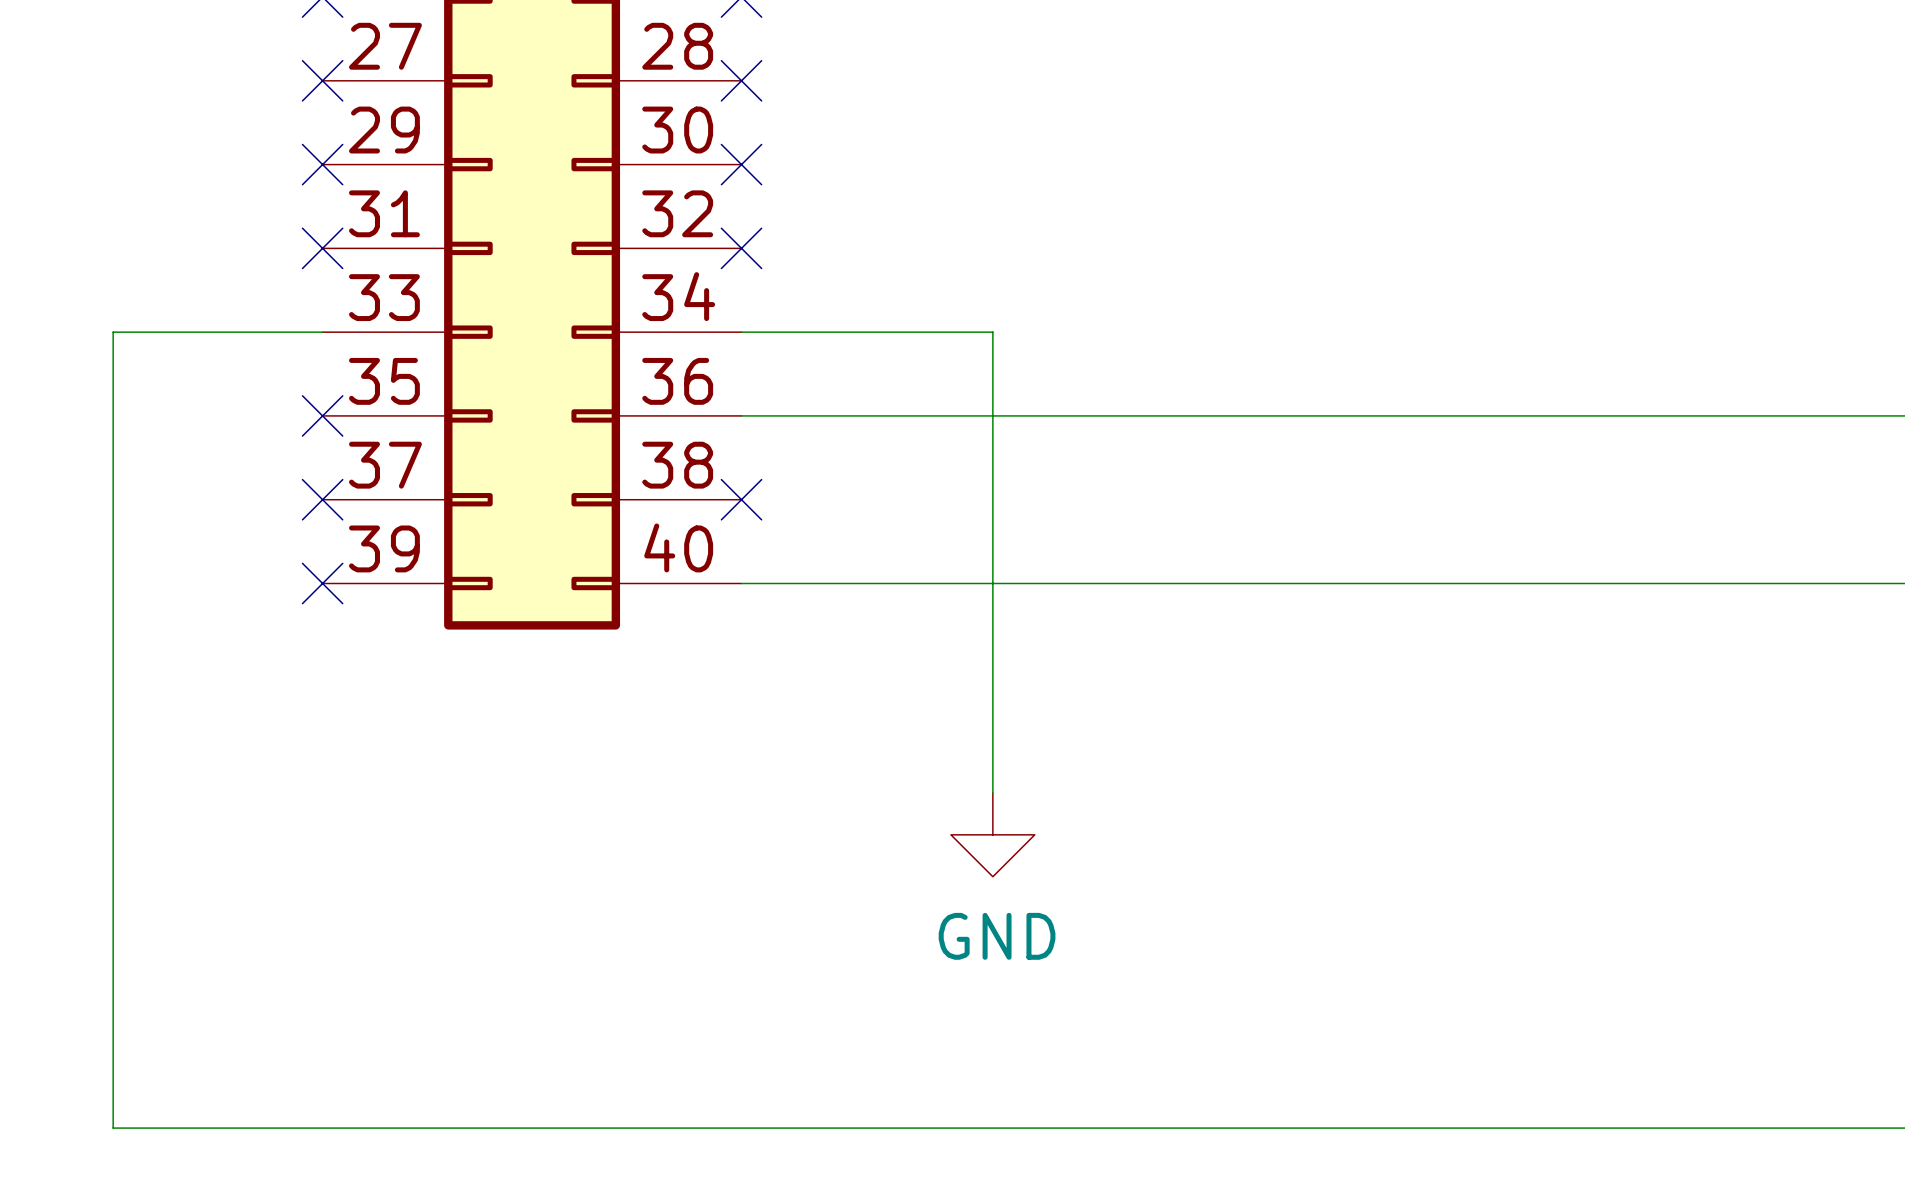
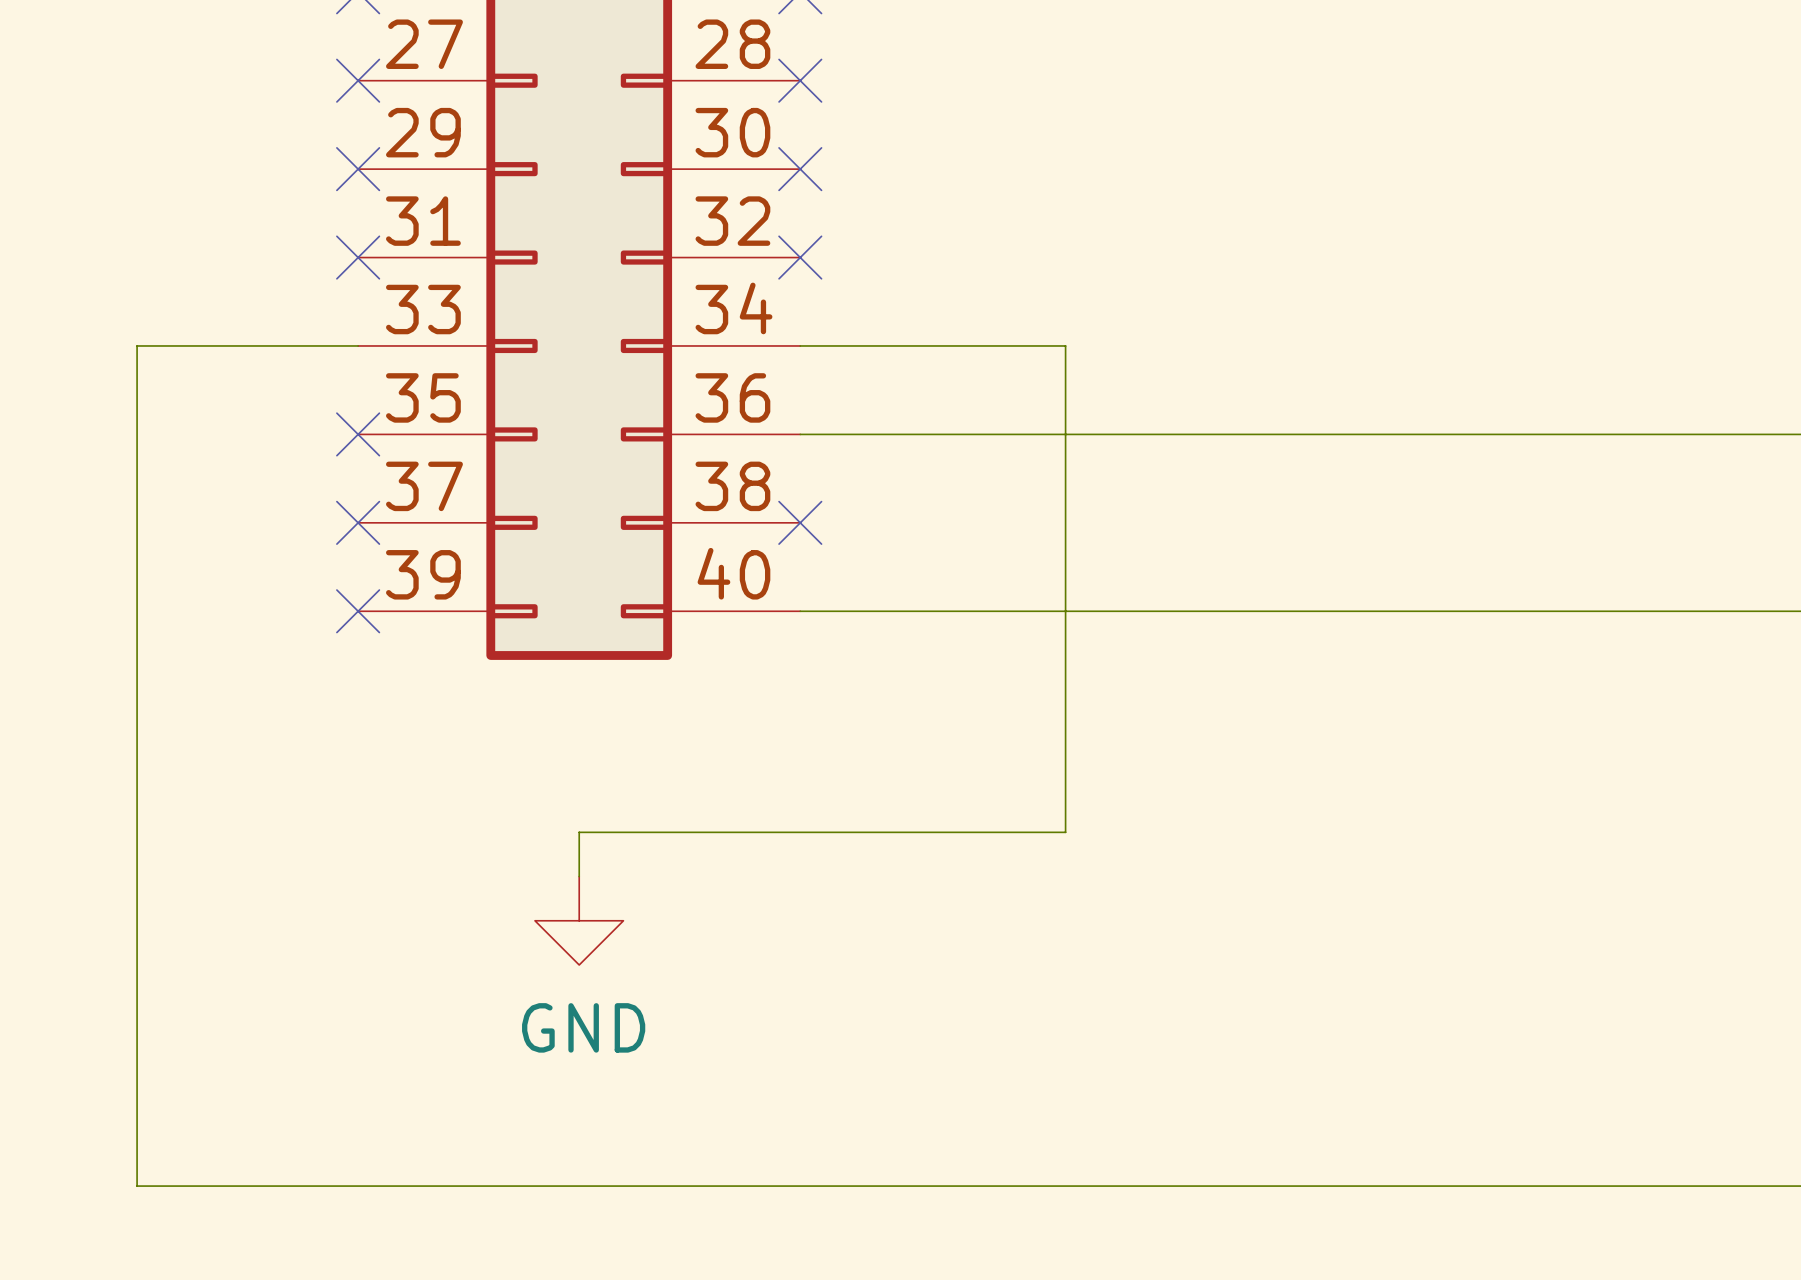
wire: none -> (1065, 832) (579, 832) (579, 876)
power symbol position: GND (992, 834) -> GND (579, 920)

